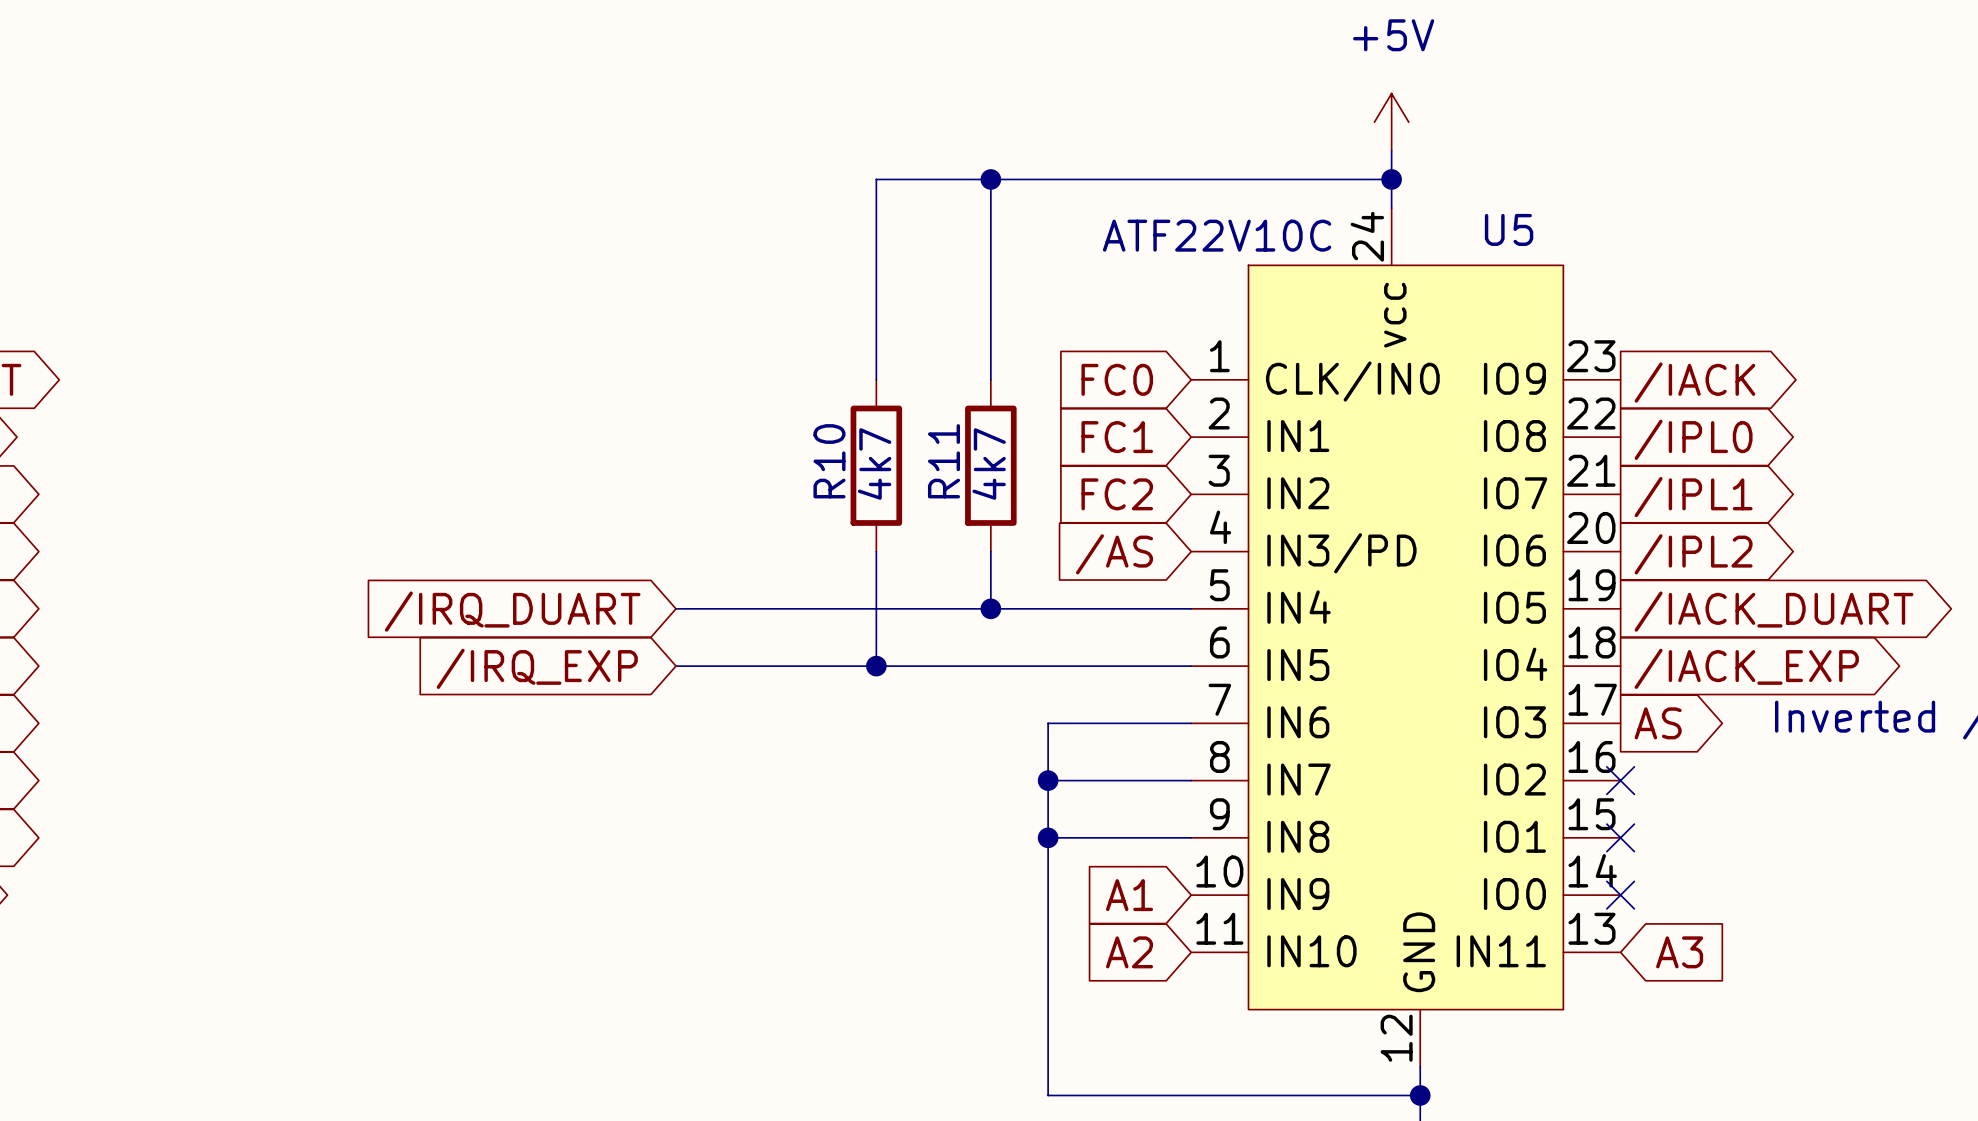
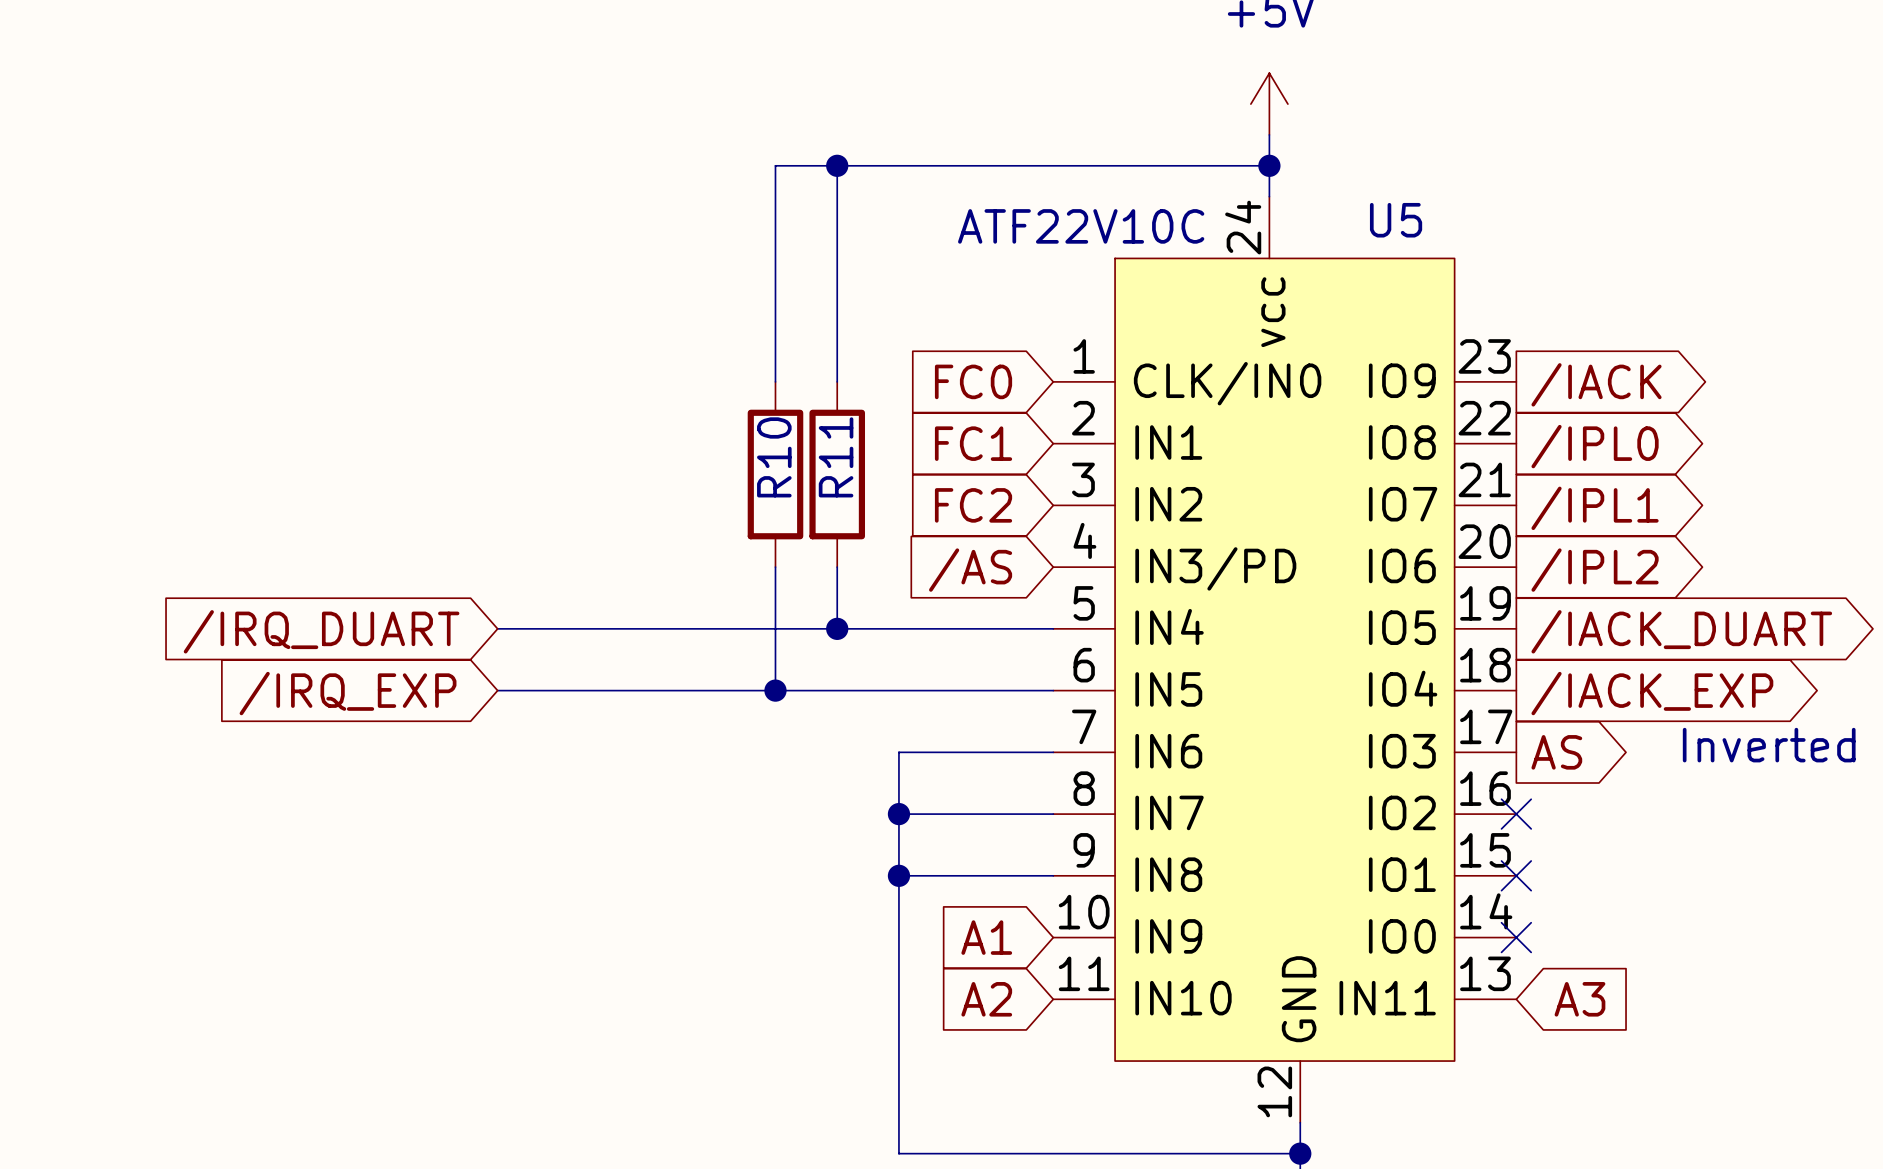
wire: (933, 179) (876, 179) (876, 379) -> (775, 165) (775, 381)
R10 name position: R10 (829, 461) -> R10 (774, 457)
R11 name position: R11 (943, 461) -> R11 (836, 457)
R10 value: 4k7 (874, 464) -> none
R11 value: 4k7 (989, 464) -> none
R10 position: (876, 465) -> (775, 474)
wire: (876, 551) (876, 666) -> (775, 567) (775, 690)
junction position: (876, 666) -> (775, 690)

